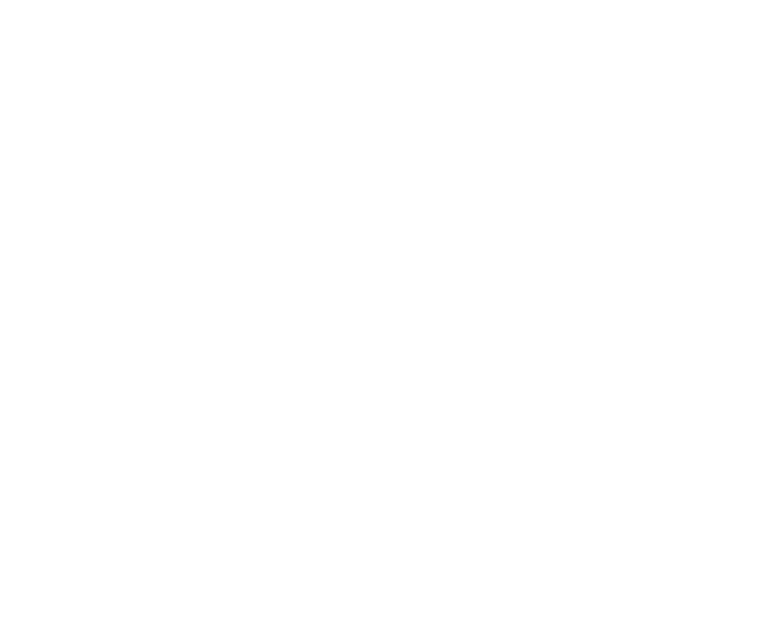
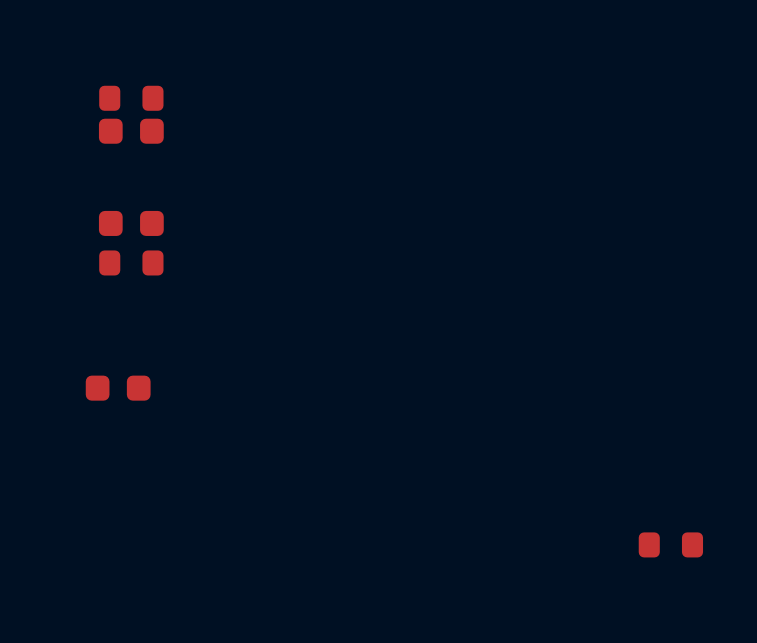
part: none -> (131, 98)
part: none -> (131, 131)
part: none -> (131, 223)
part: none -> (131, 262)
part: none -> (118, 388)
part: none -> (670, 544)

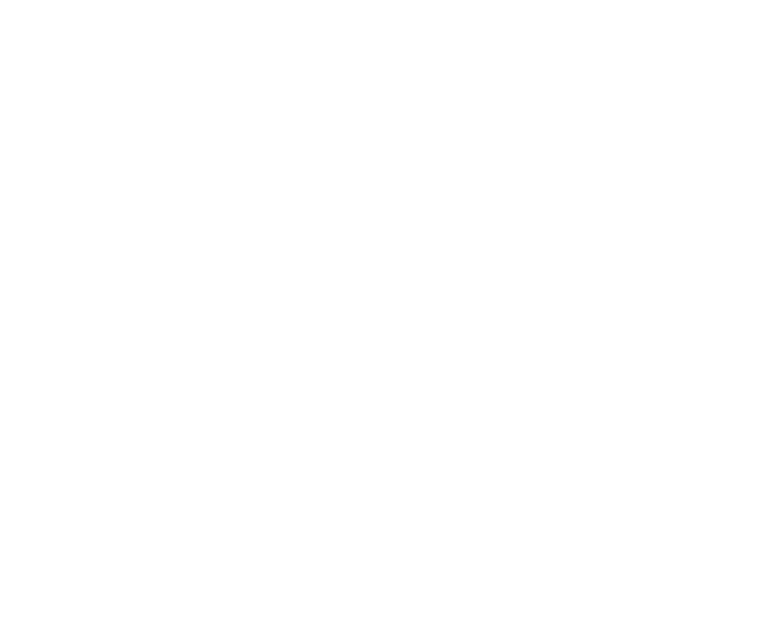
part: (131, 98) -> none
part: (131, 131) -> none
part: (131, 223) -> none
part: (131, 262) -> none
part: (118, 388) -> none
part: (670, 544) -> none

